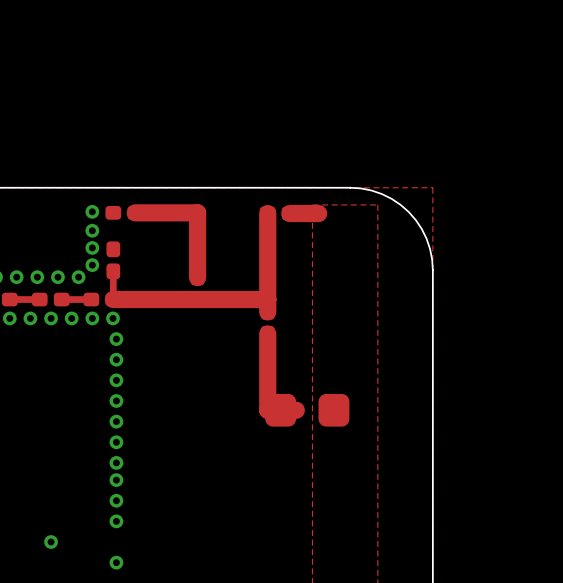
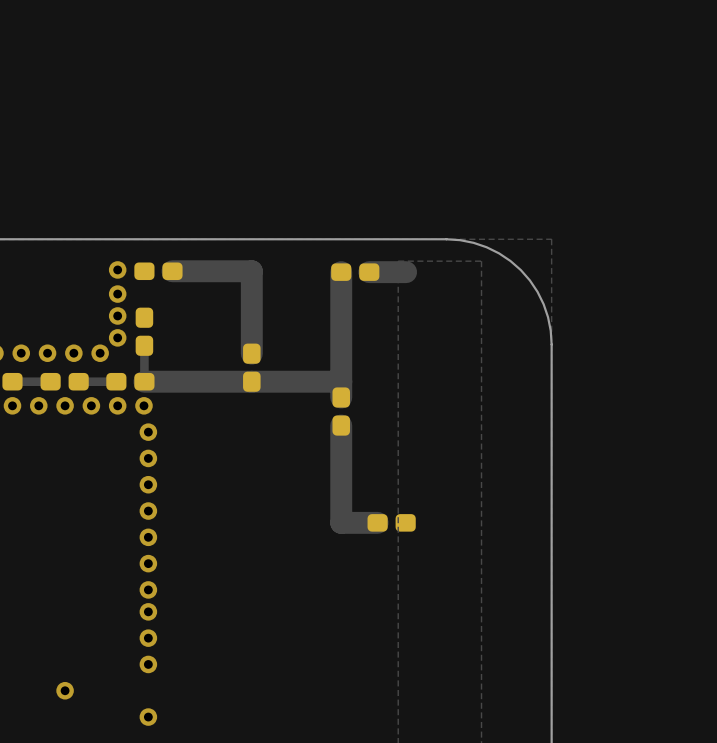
part footprint: [265, 393, 350, 427] -> [367, 514, 416, 532]

